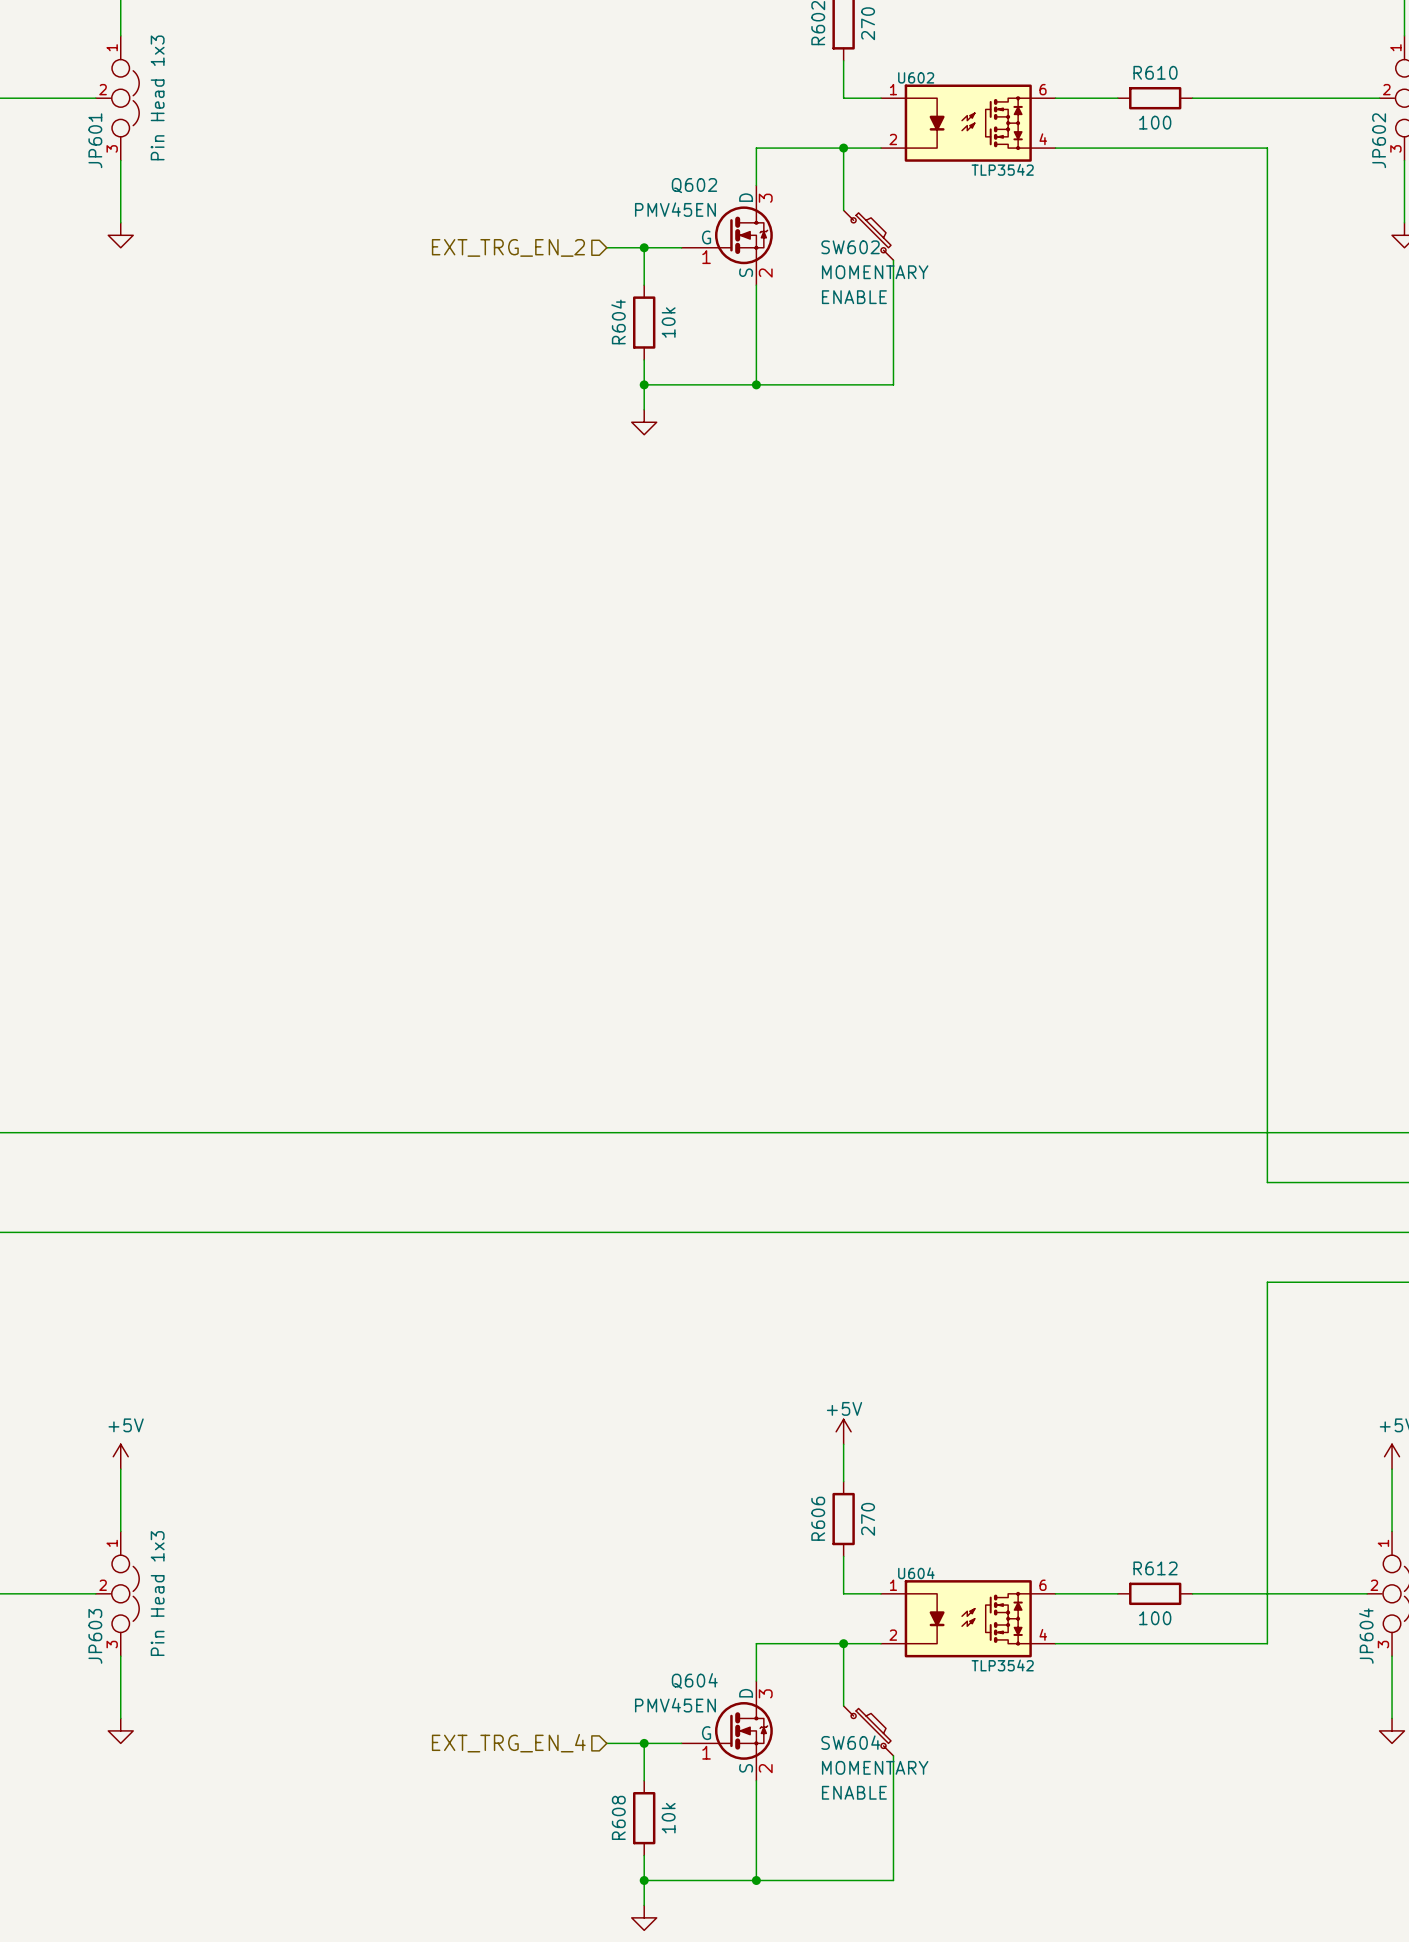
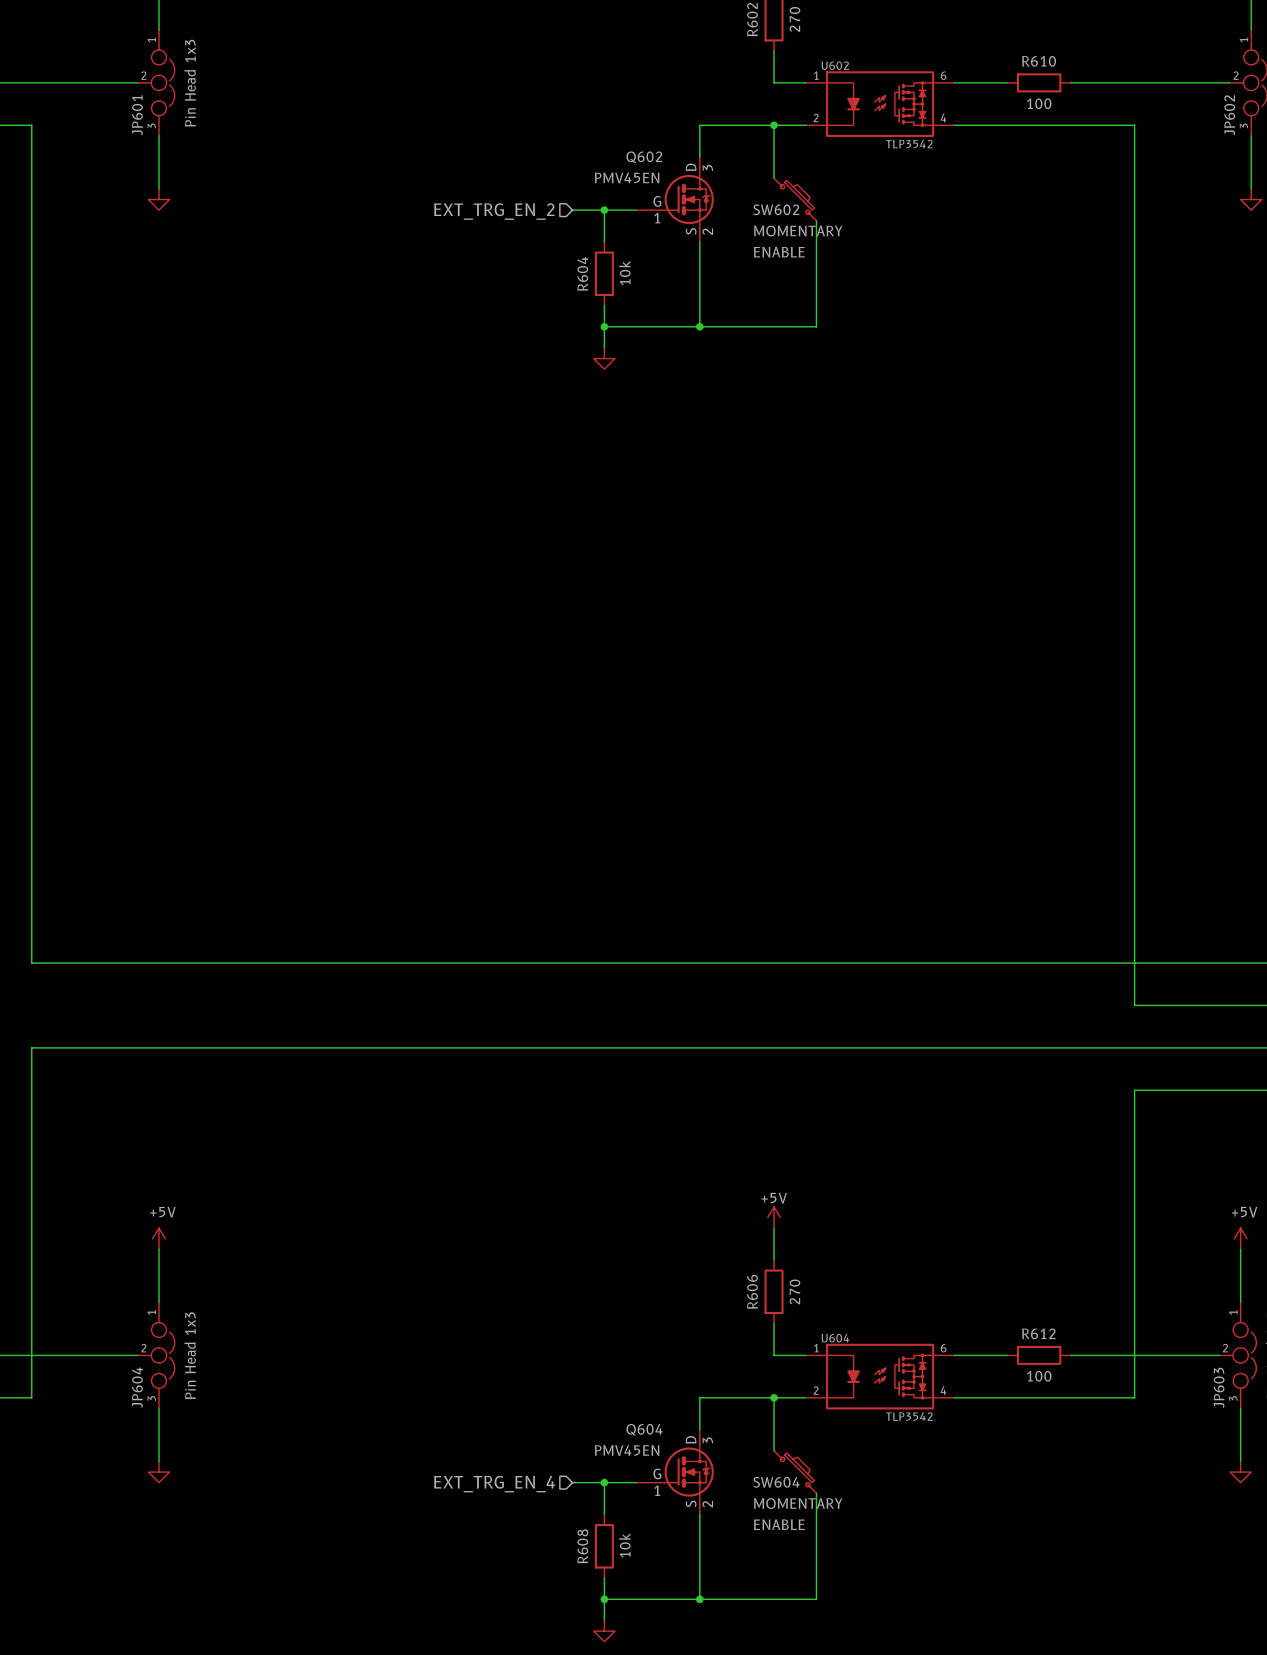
JP603 name: JP603 (95, 1636) -> JP604 (137, 1387)
JP604 name: JP604 (1366, 1636) -> JP603 (1219, 1387)

